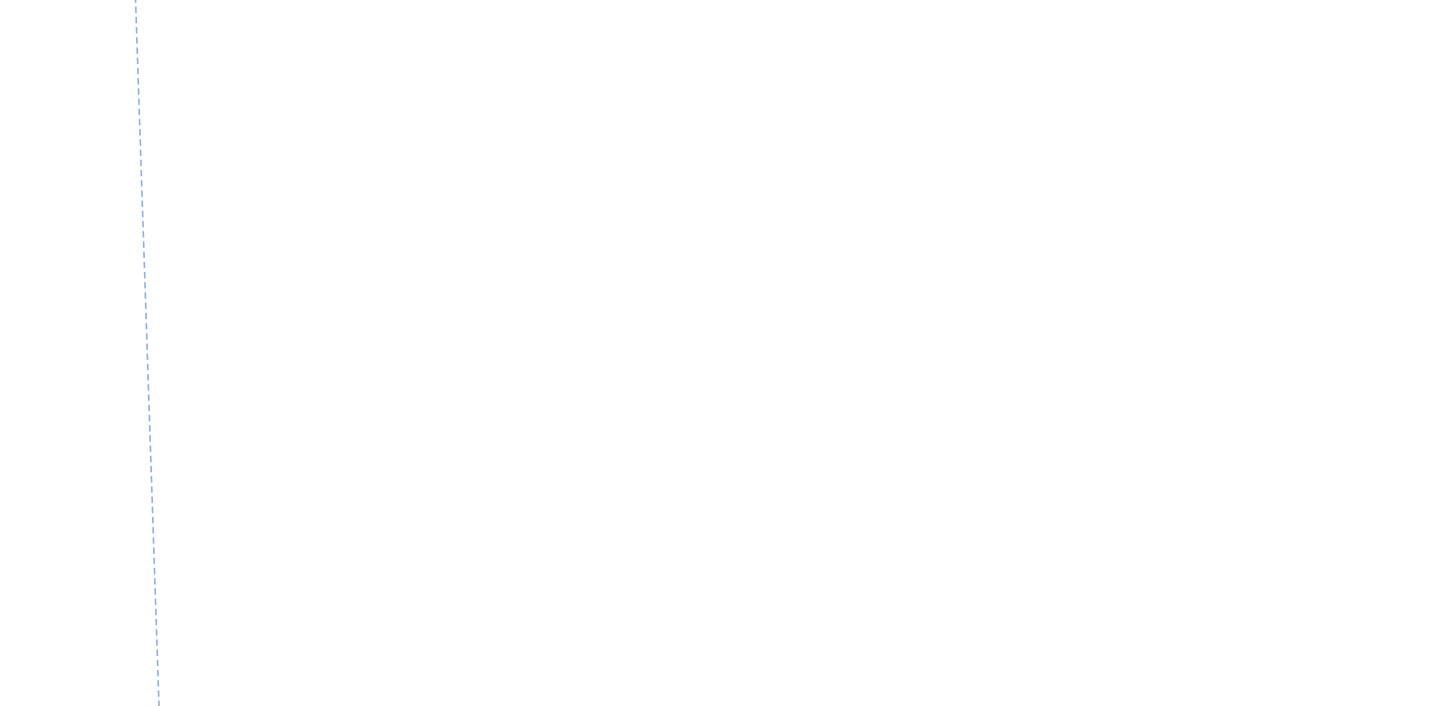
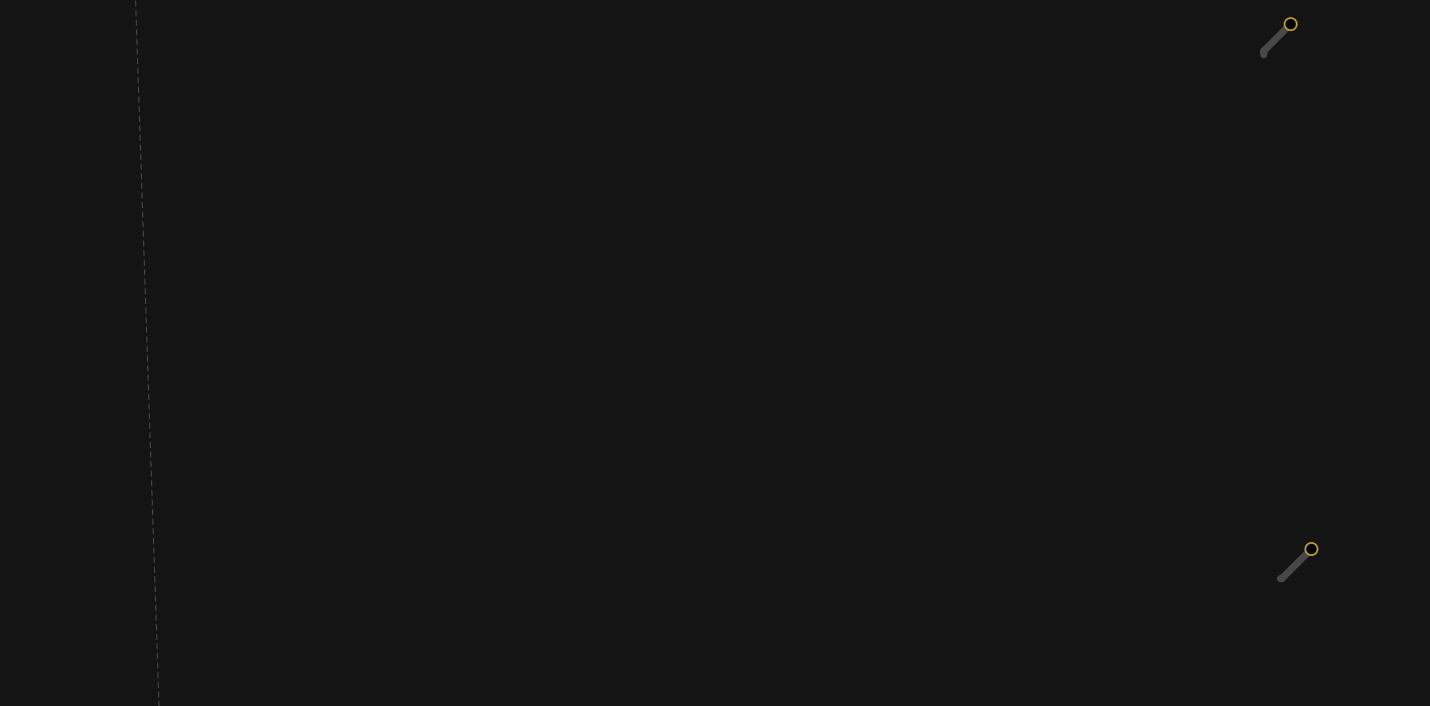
track: none -> (1290, 24) (1263, 50) (1263, 54)
via: none -> (1290, 24)
track: none -> (1311, 549) (1280, 578)
via: none -> (1311, 549)

